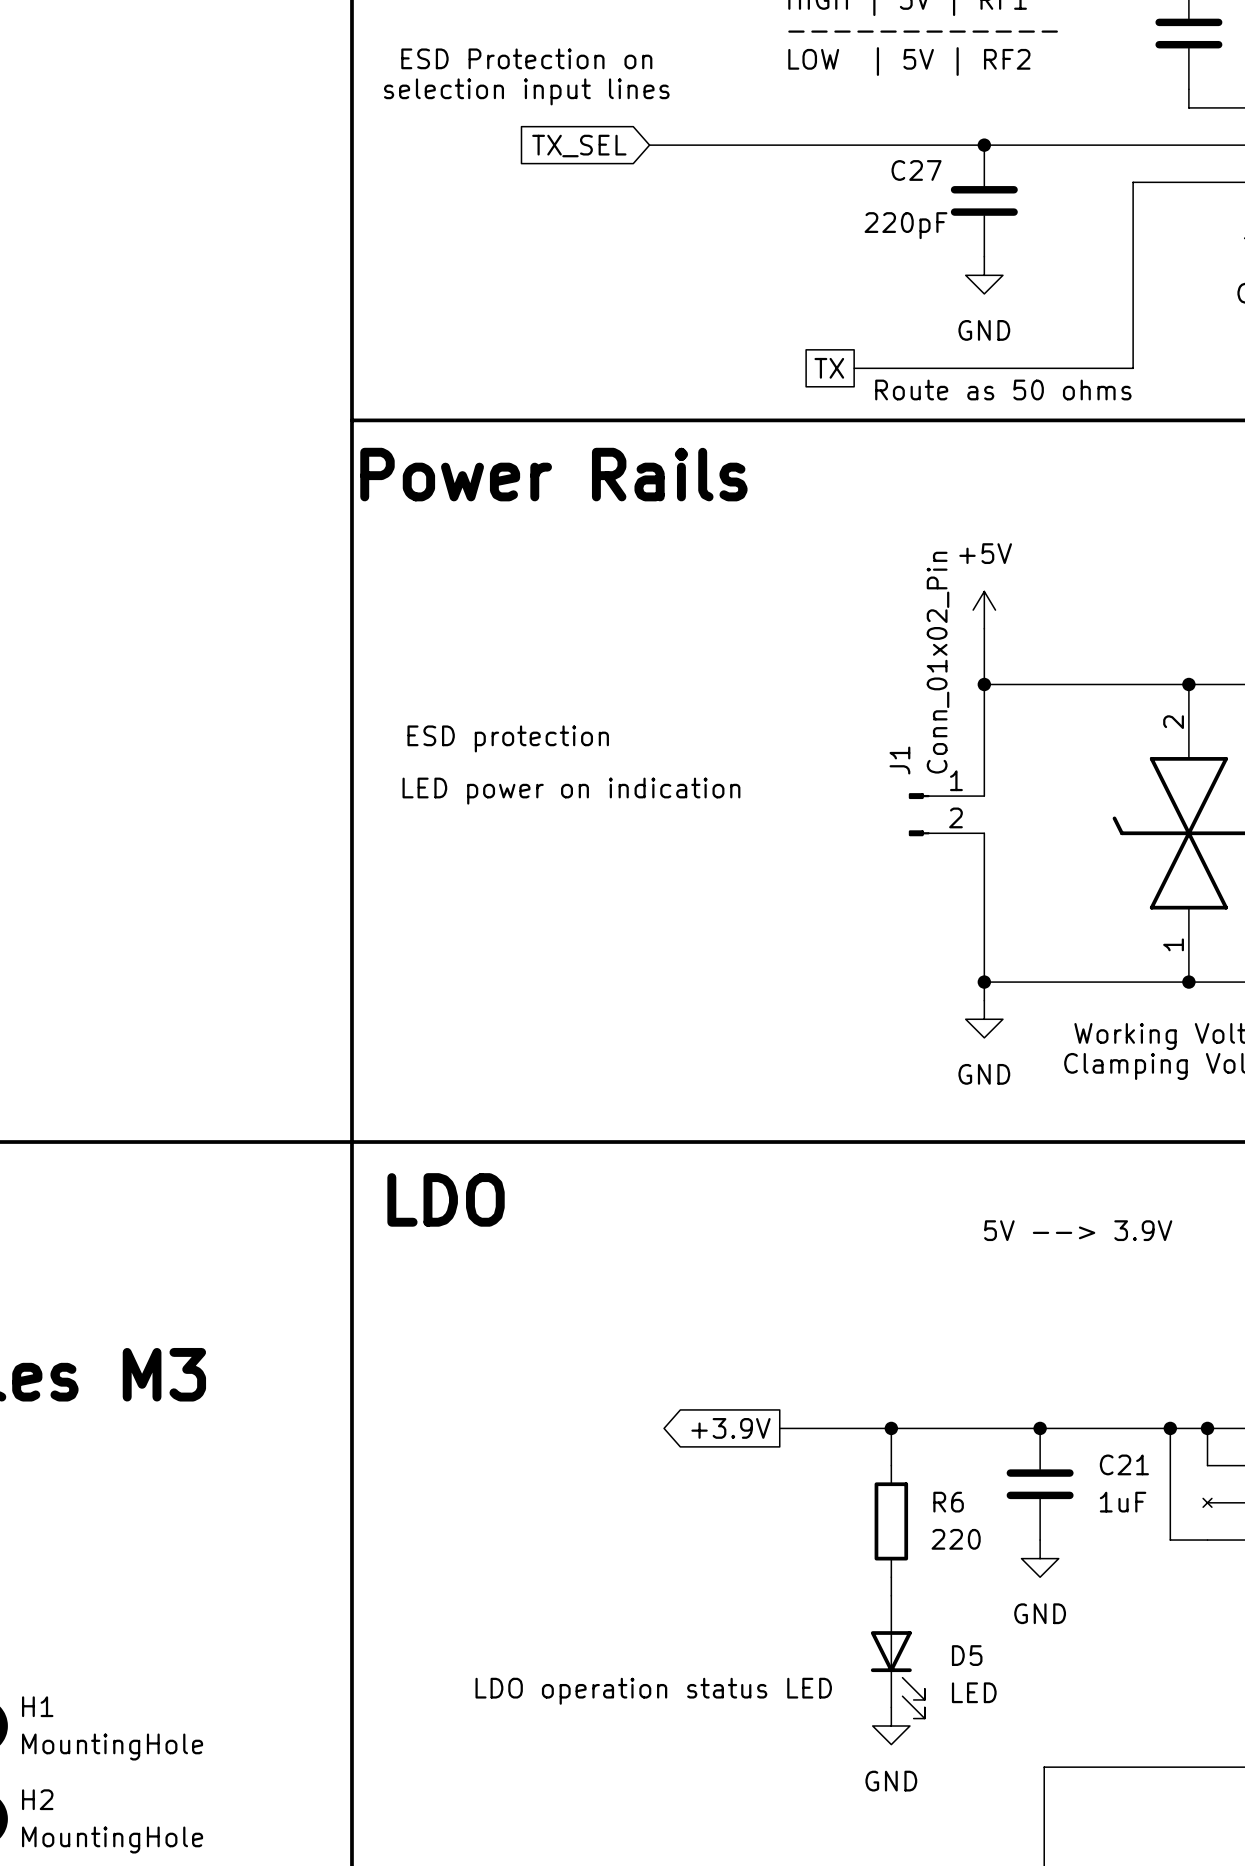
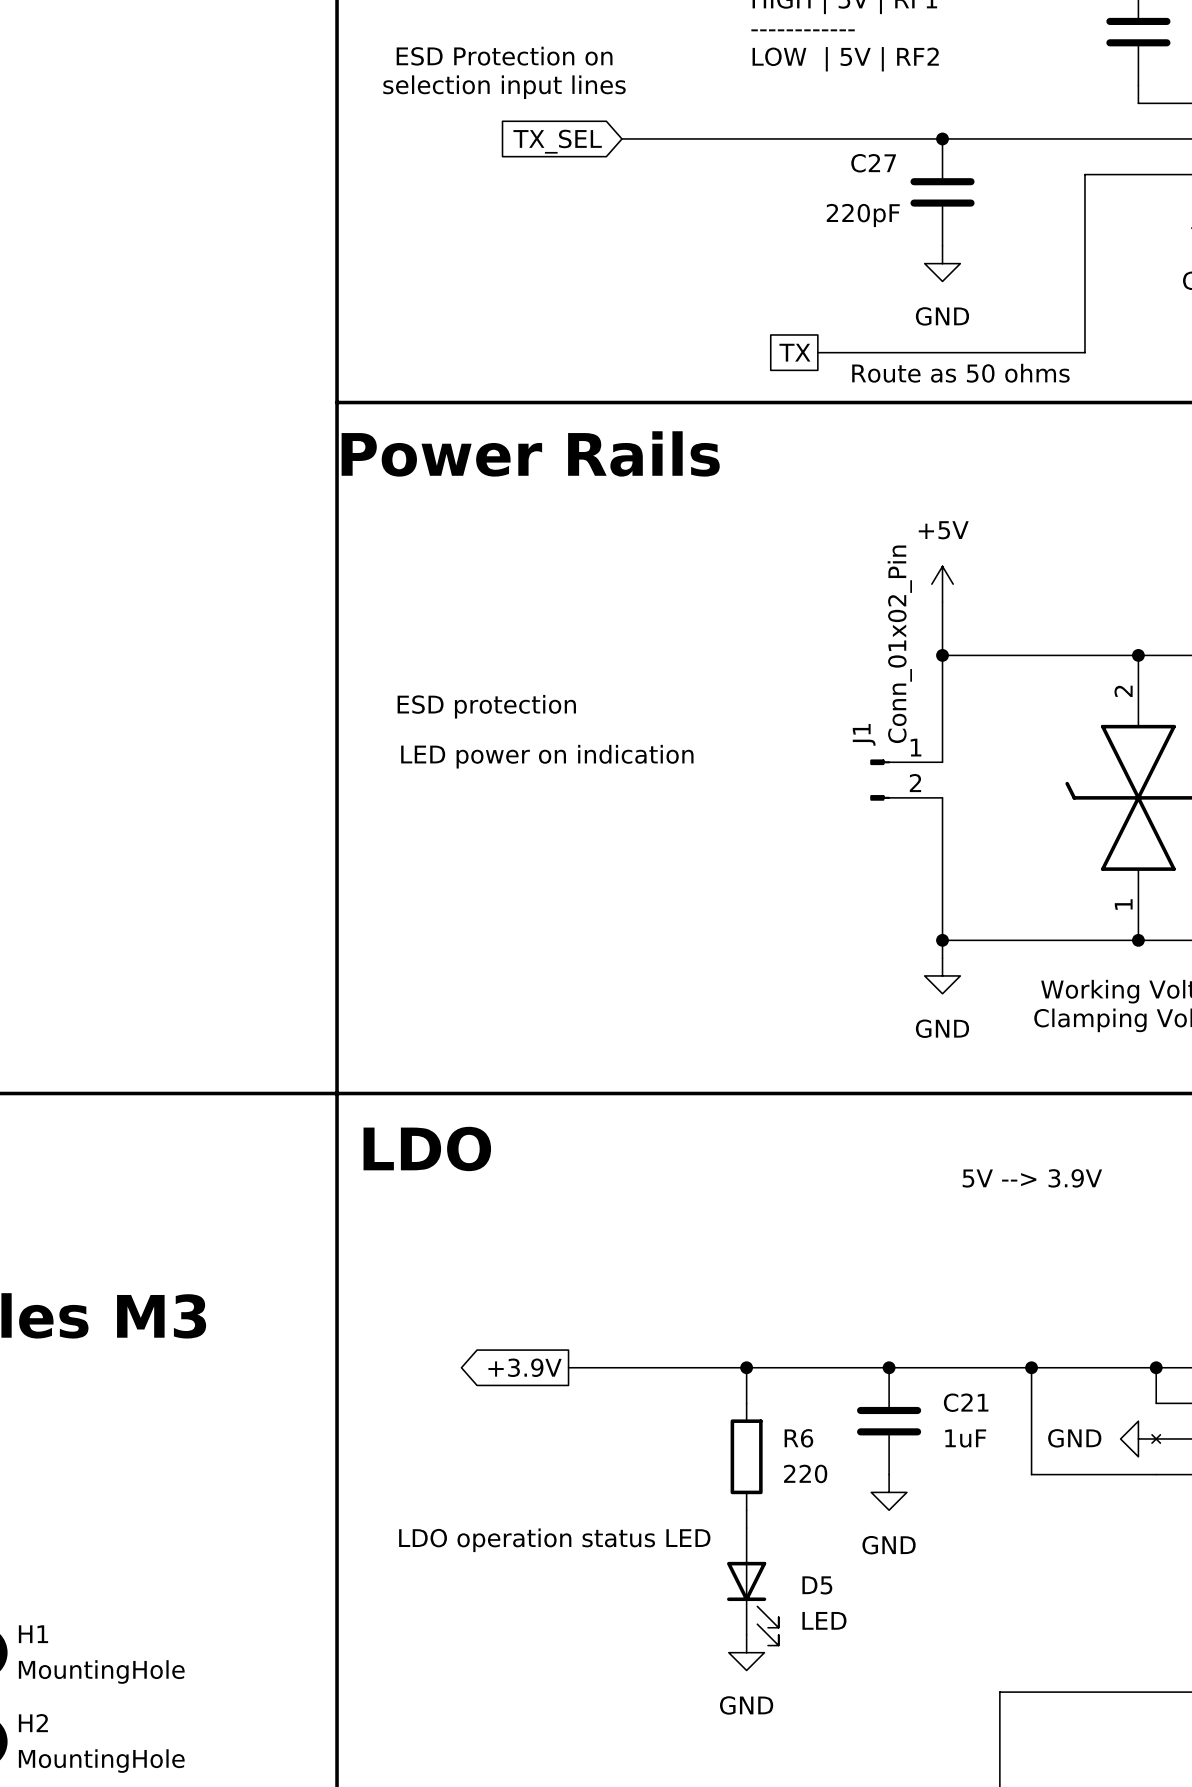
wire: none -> (568, 1367) (746, 1367) (746, 1403)
global label position: +3.9V (731, 1428) -> +3.9V (525, 1367)
junction: none -> (746, 1367)
wire: (891, 1428) (891, 1465) -> none
junction position: (891, 1428) -> (889, 1367)
junction position: (1040, 1428) -> (1031, 1367)
wire: (1170, 1428) (1170, 1540) -> (1031, 1367) (1031, 1474) (1120, 1474)
junction: (1170, 1428) -> none
C21 position: (1040, 1484) -> (889, 1421)
power symbol: none -> GND (1138, 1438)
R6 position: (891, 1521) -> (746, 1456)
power symbol: none -> GND (889, 1492)
power symbol: GND (1040, 1558) -> none
wire: (891, 1577) (891, 1595) -> (746, 1510) (746, 1528)
D5 position: (897, 1657) -> (752, 1586)
text position: LDO operation status LED (653, 1691) -> LDO operation status LED (554, 1540)
power symbol: none -> GND (746, 1652)
power symbol: GND (891, 1726) -> none

